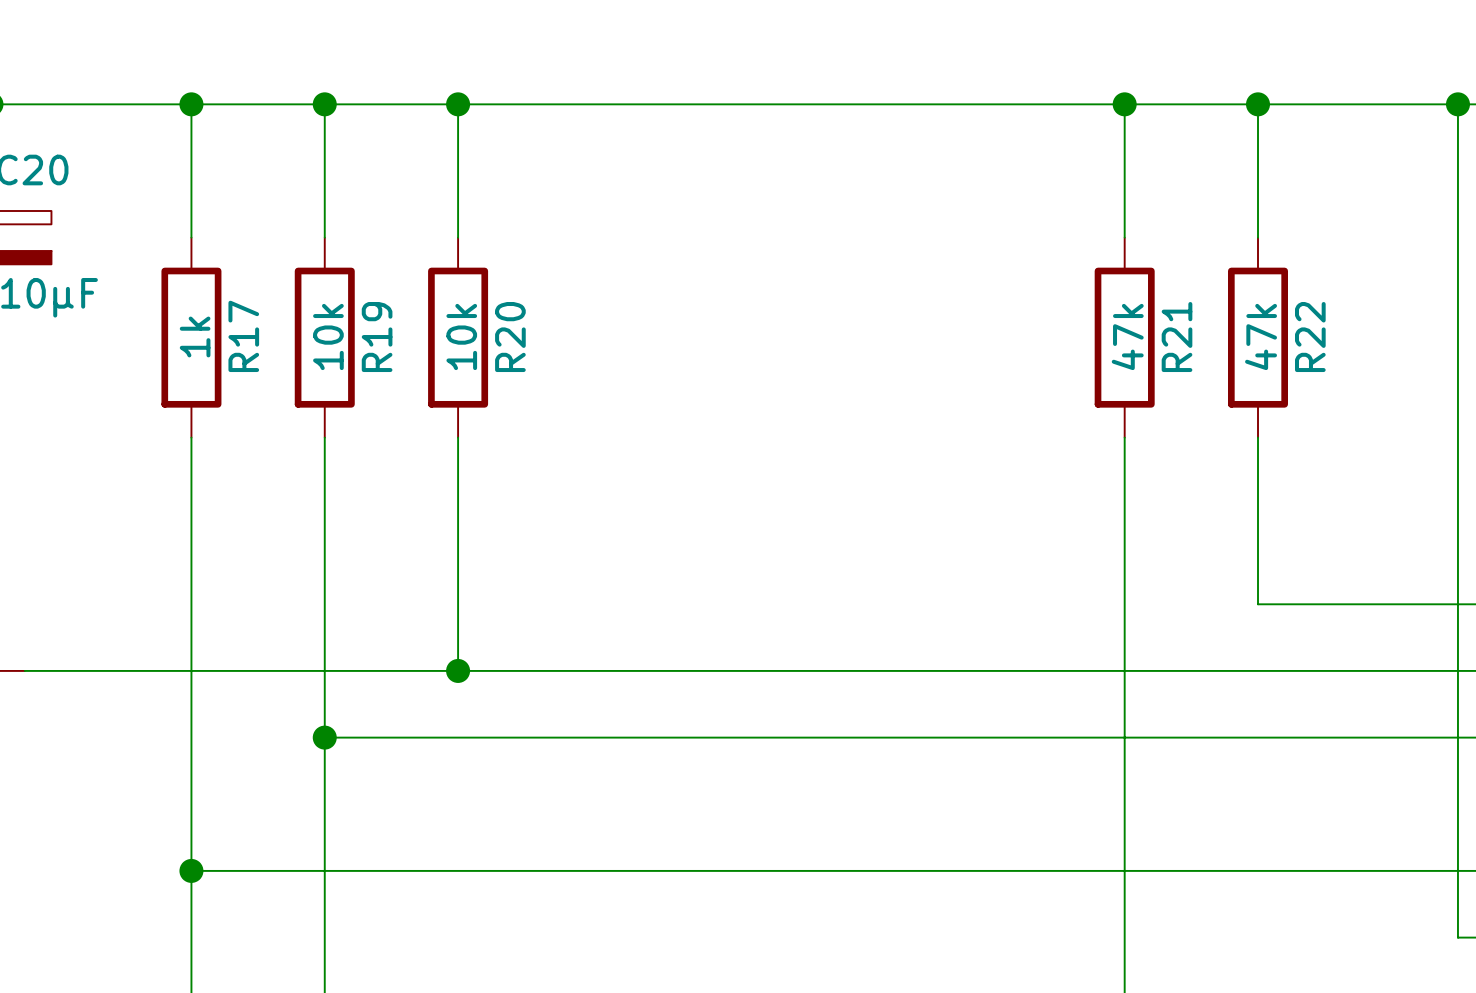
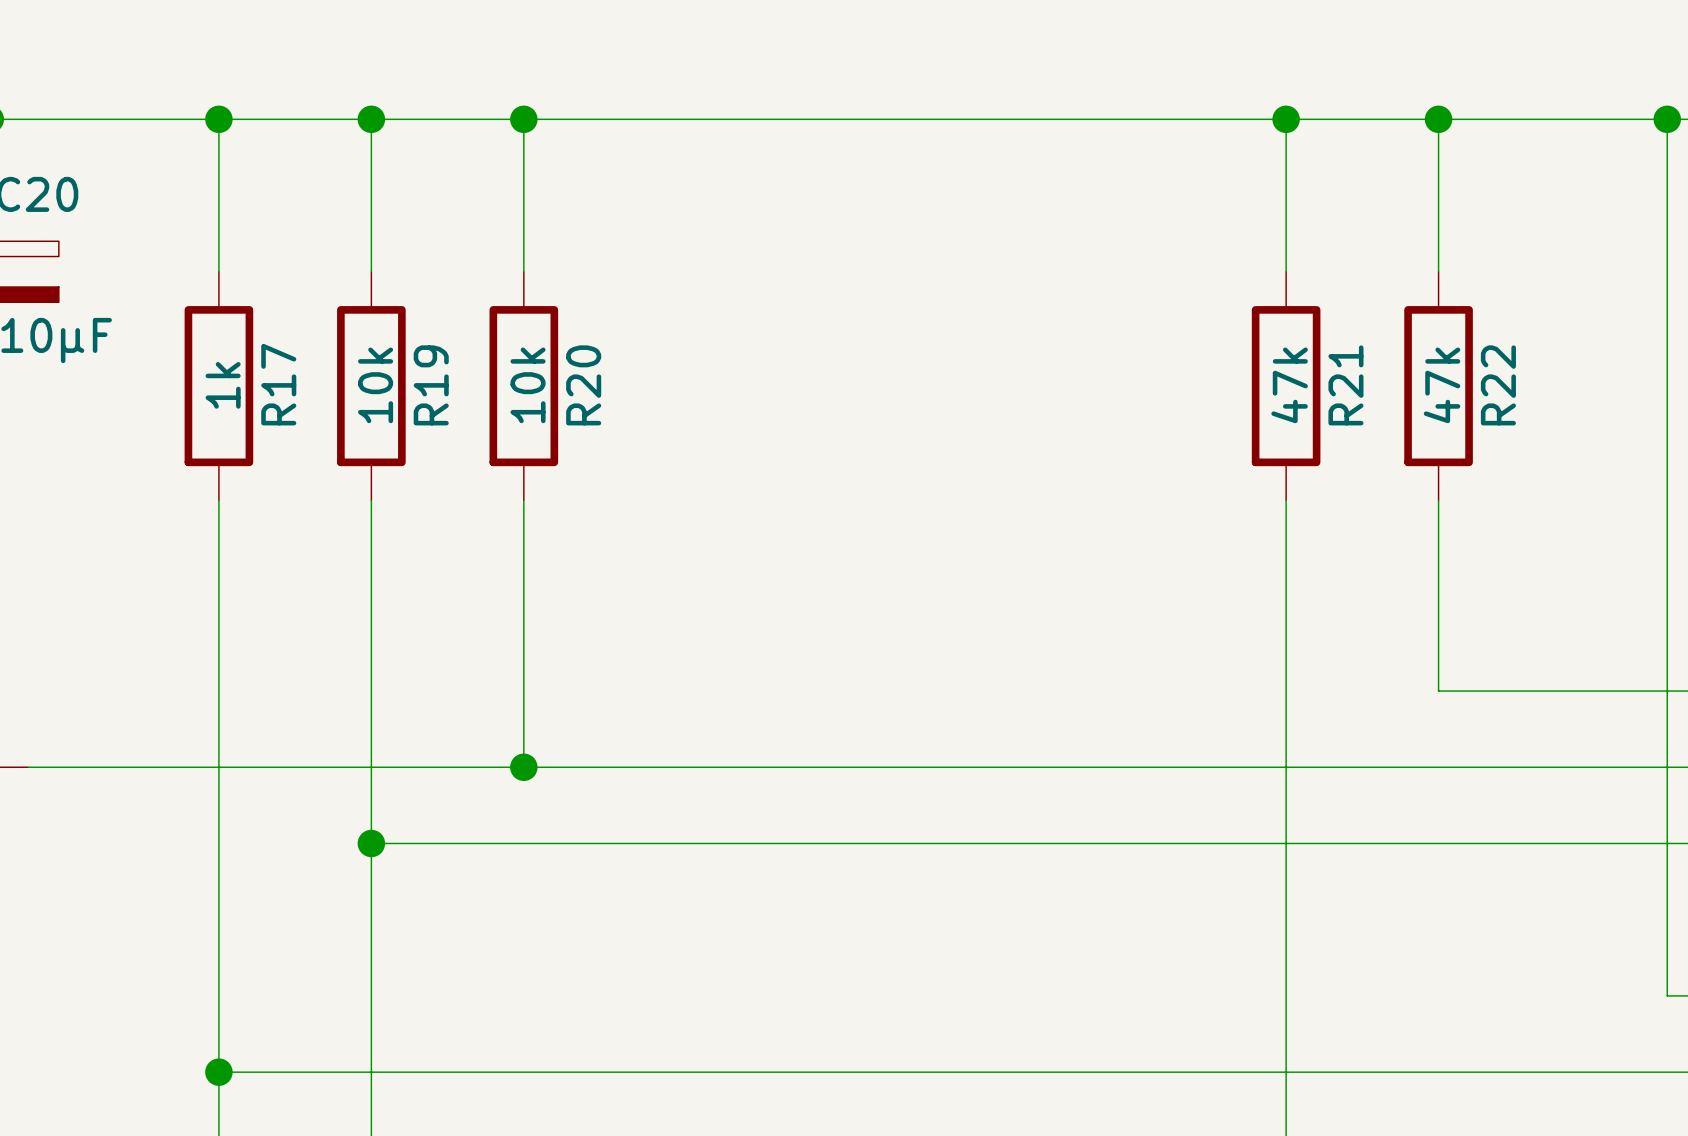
wire: (191, 870) (1457, 870) (1457, 937) -> (218, 1072) (1667, 1072)
junction position: (191, 870) -> (218, 1072)

